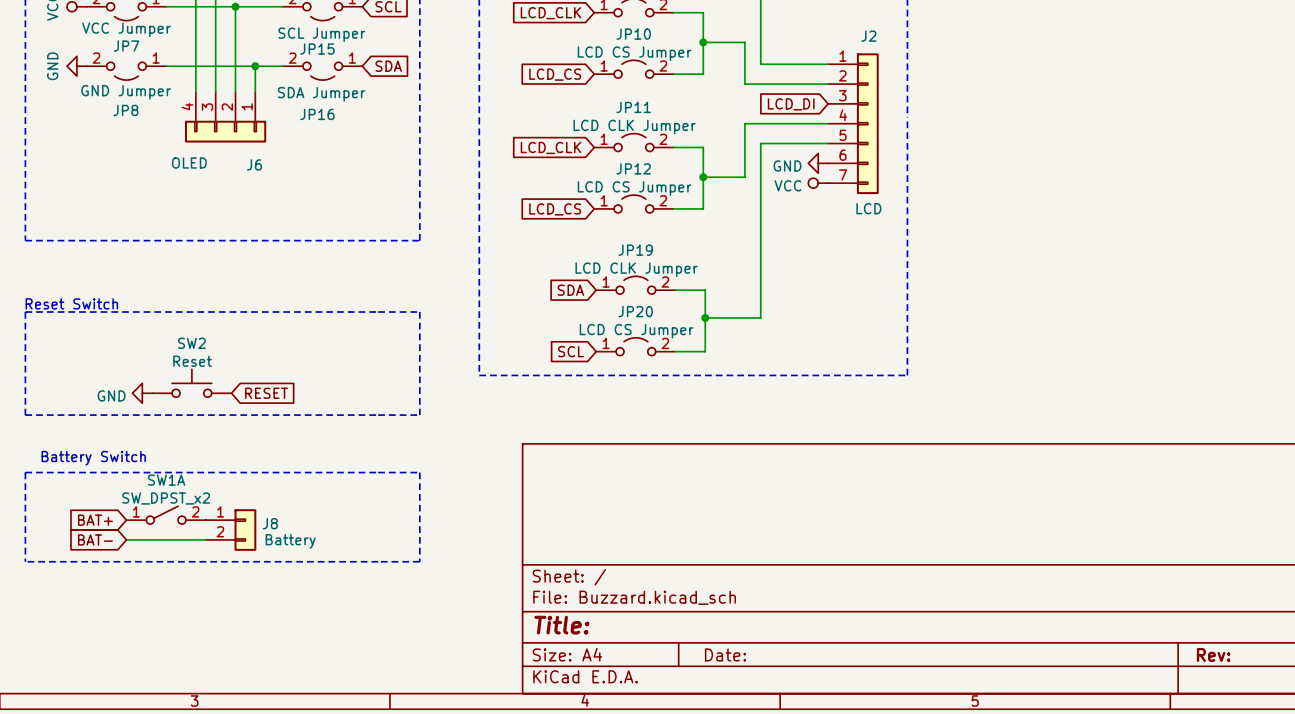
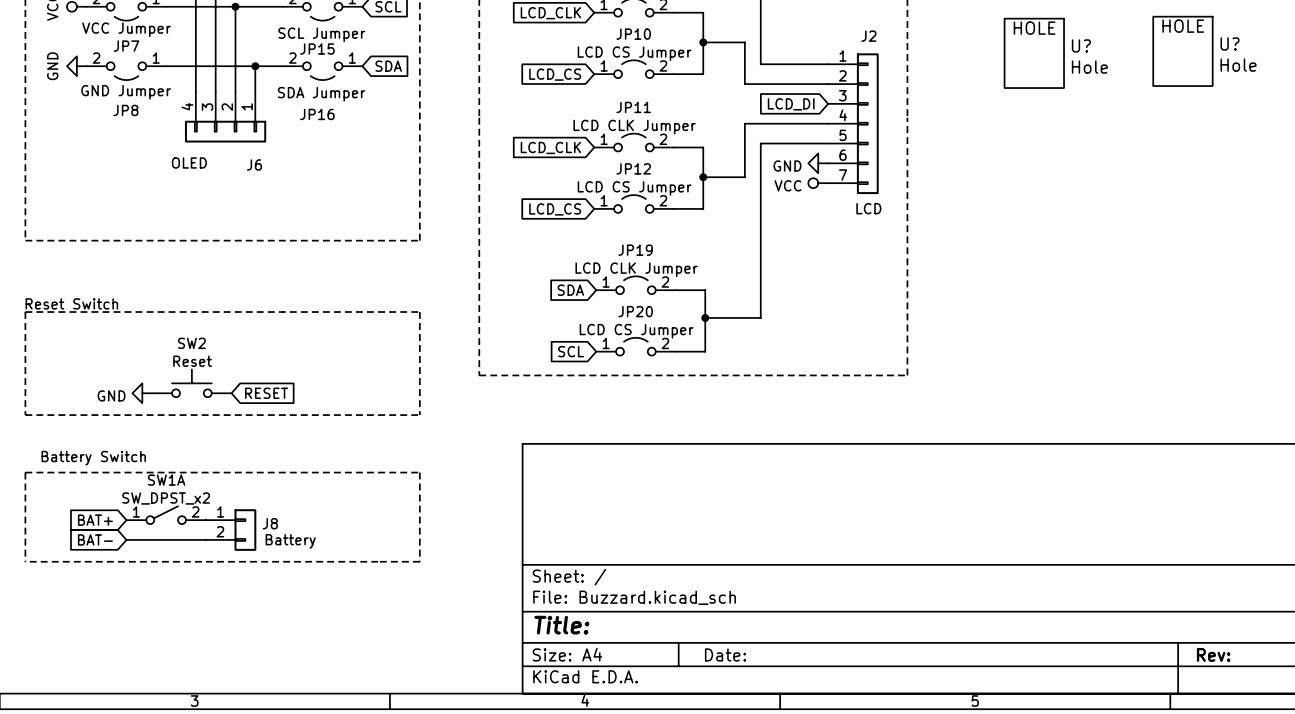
U?: none -> Hole (1182, 51)
U?: none -> Hole (1034, 53)

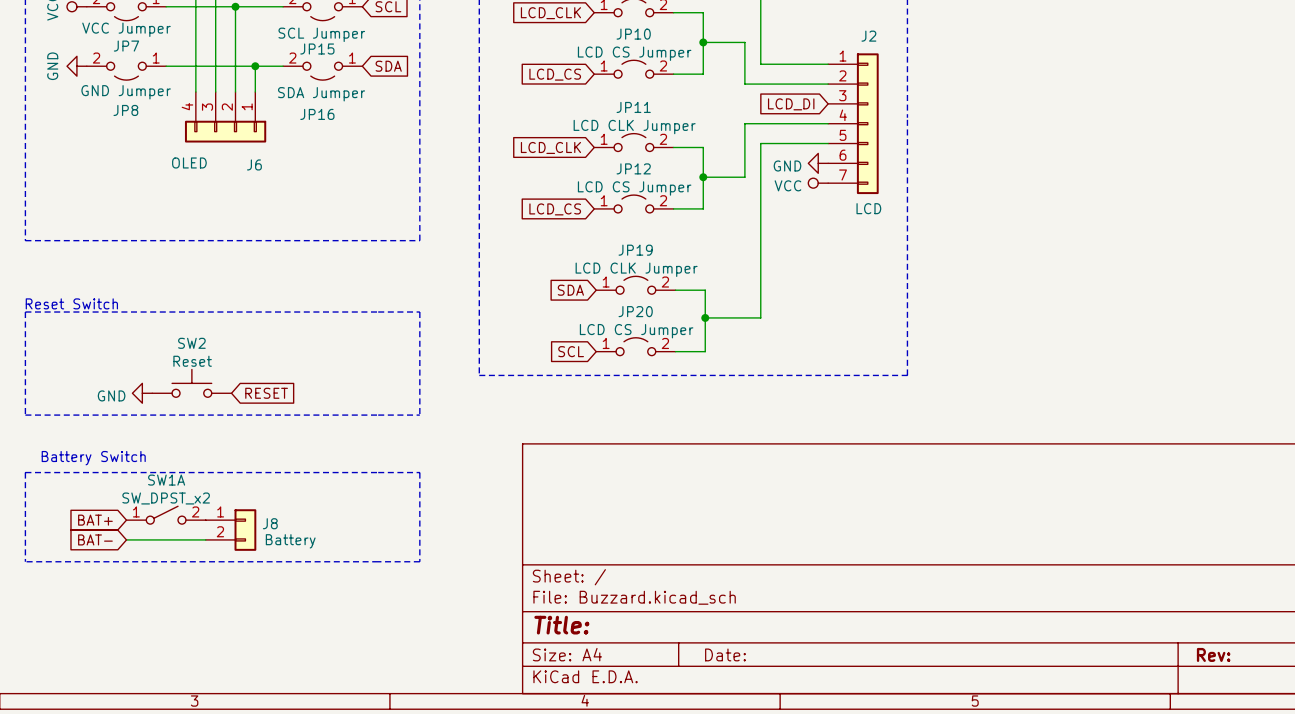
U?: Hole (1182, 51) -> none
U?: Hole (1034, 53) -> none

